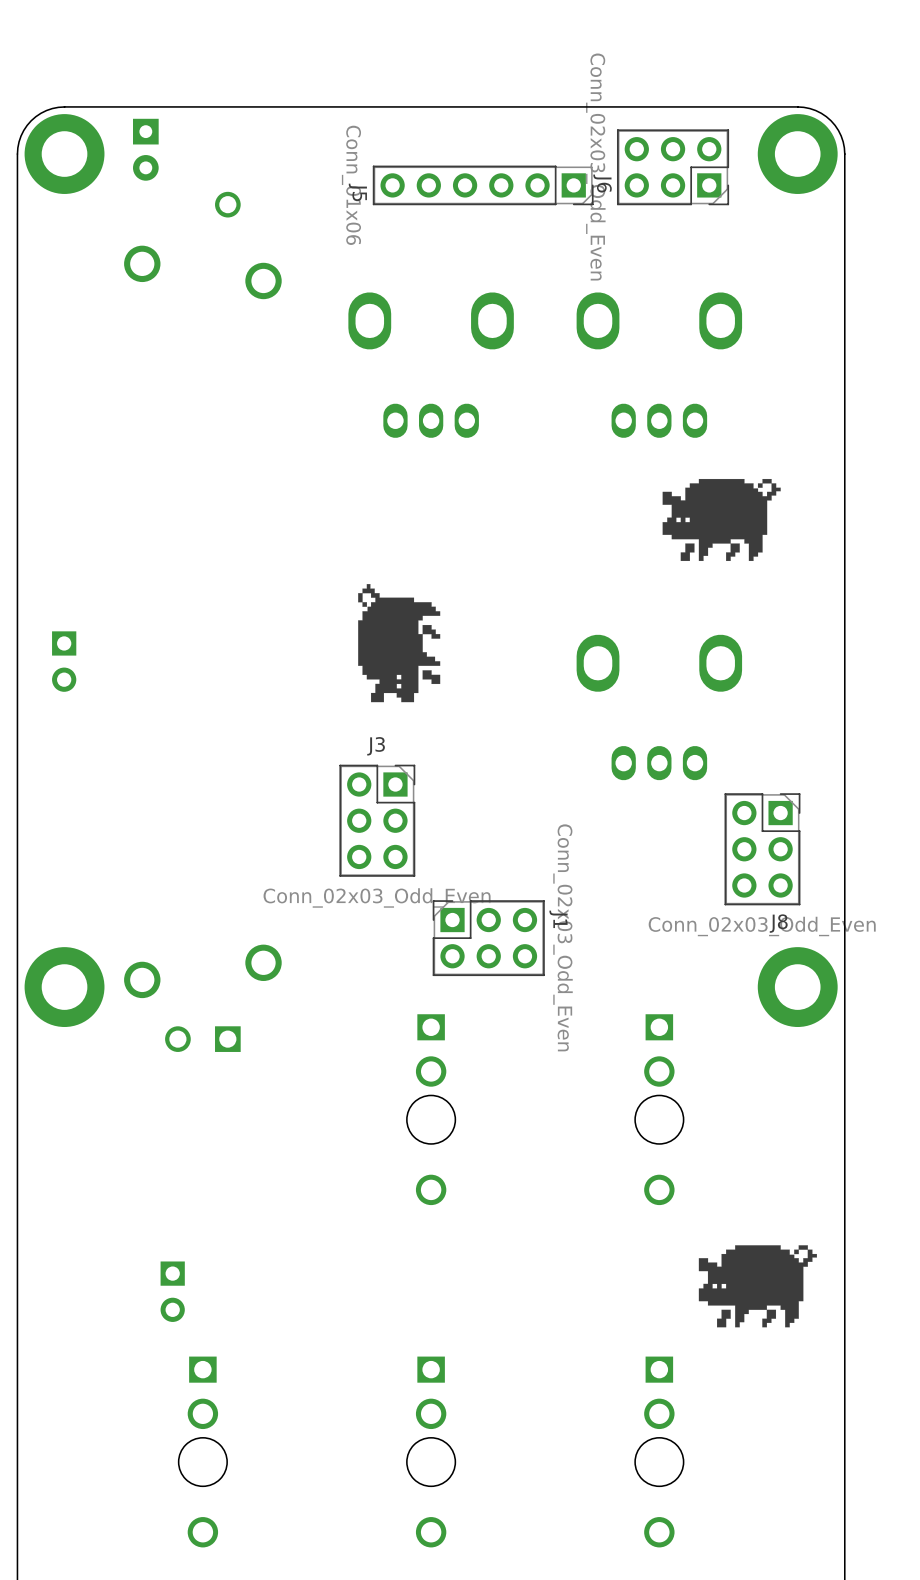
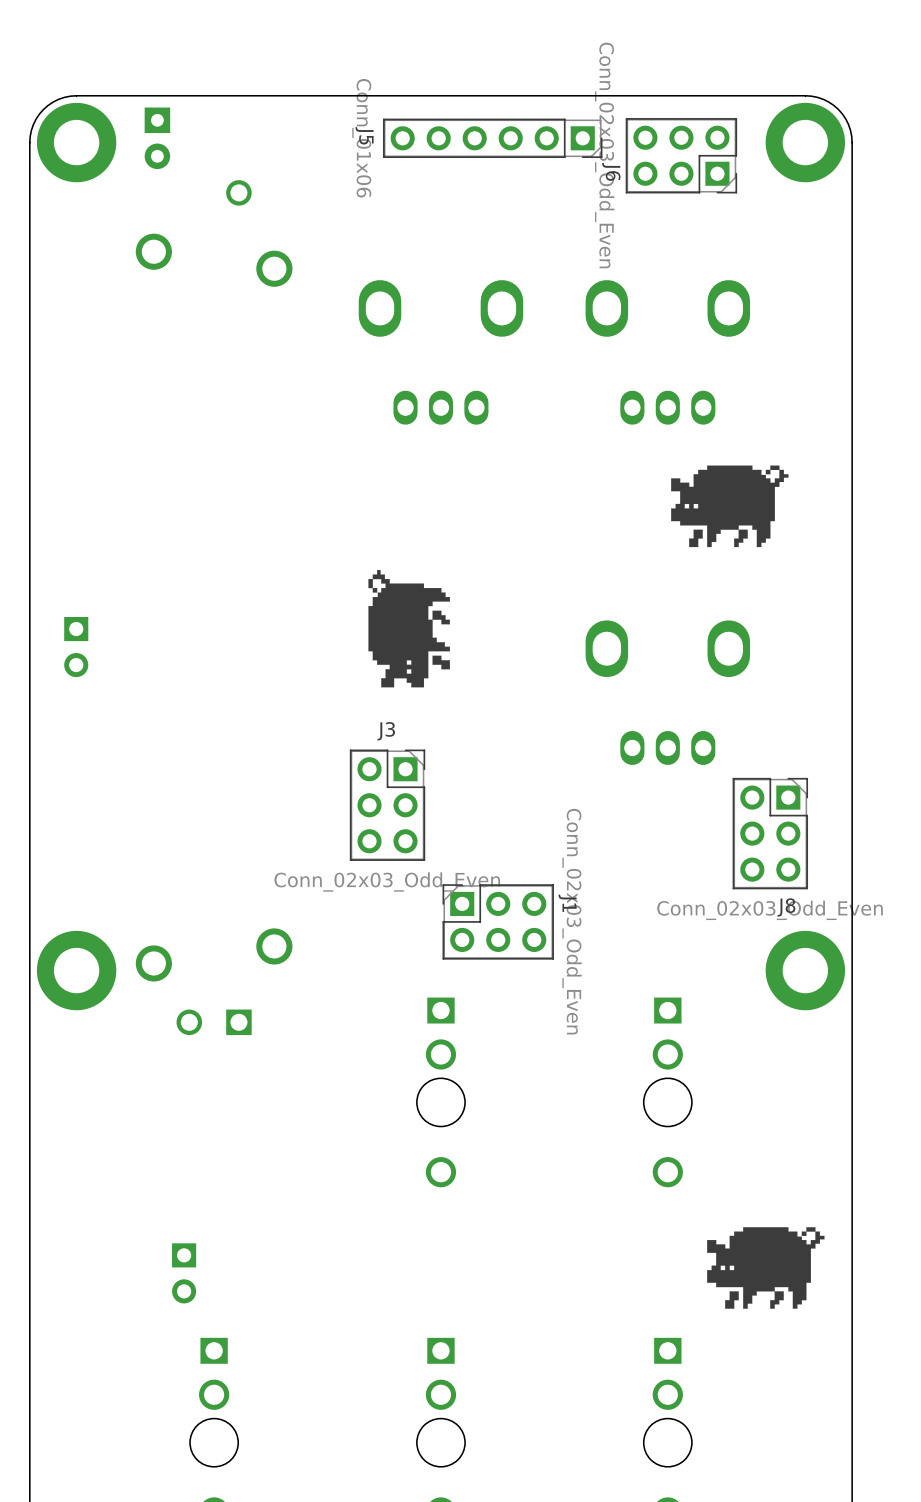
J5 position: (483, 185) -> (492, 138)
J5 name position: J5 (357, 192) -> J5 (364, 135)

